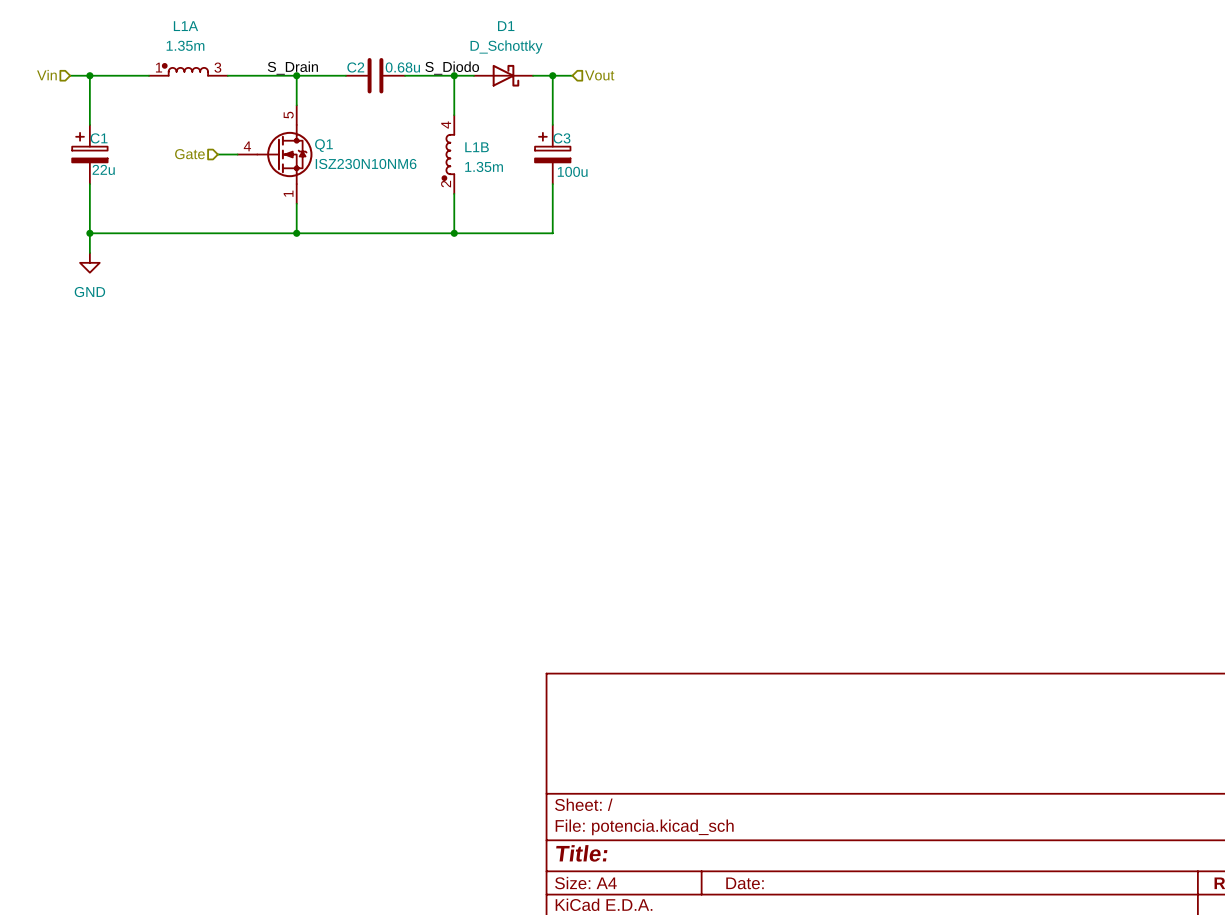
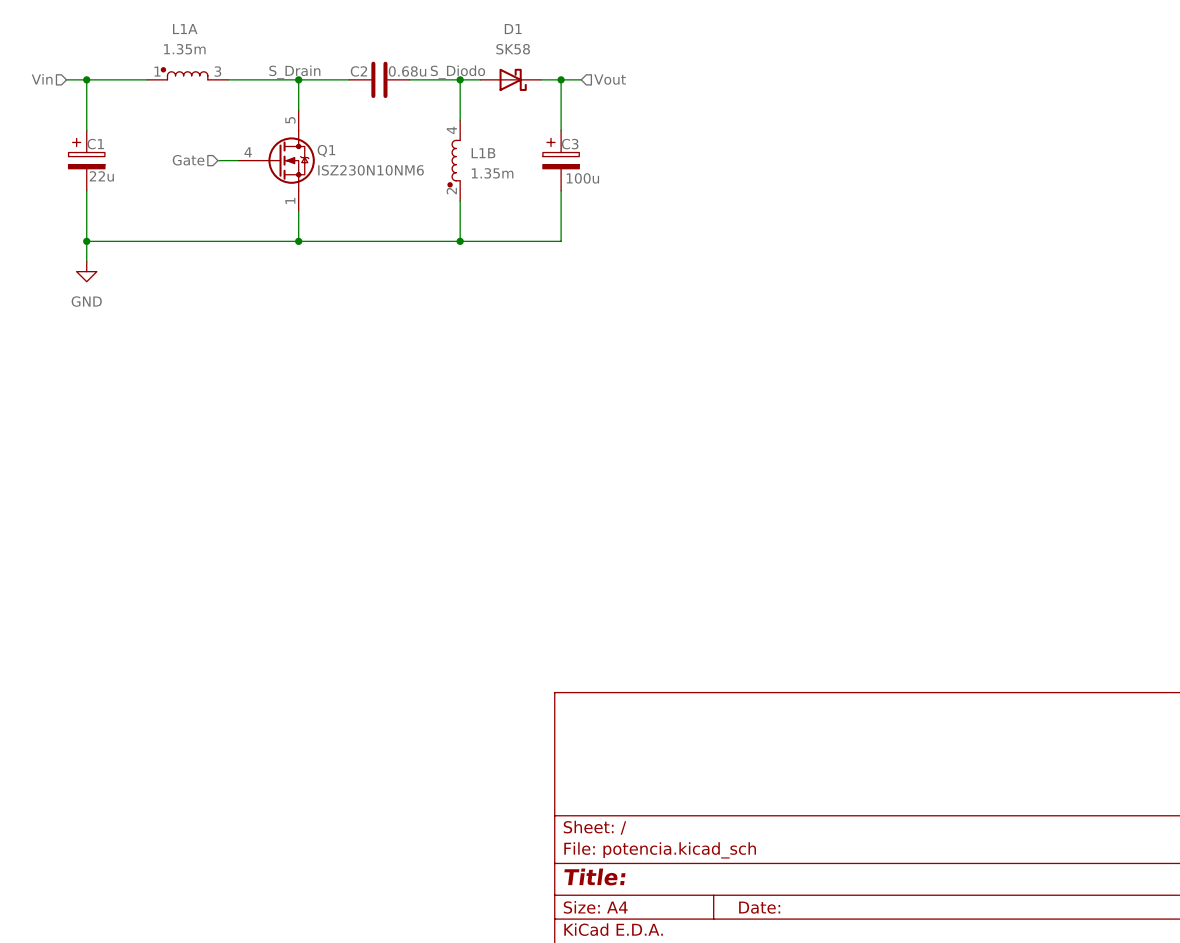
D1 value: D_Schottky (506, 47) -> SK58 (513, 49)

